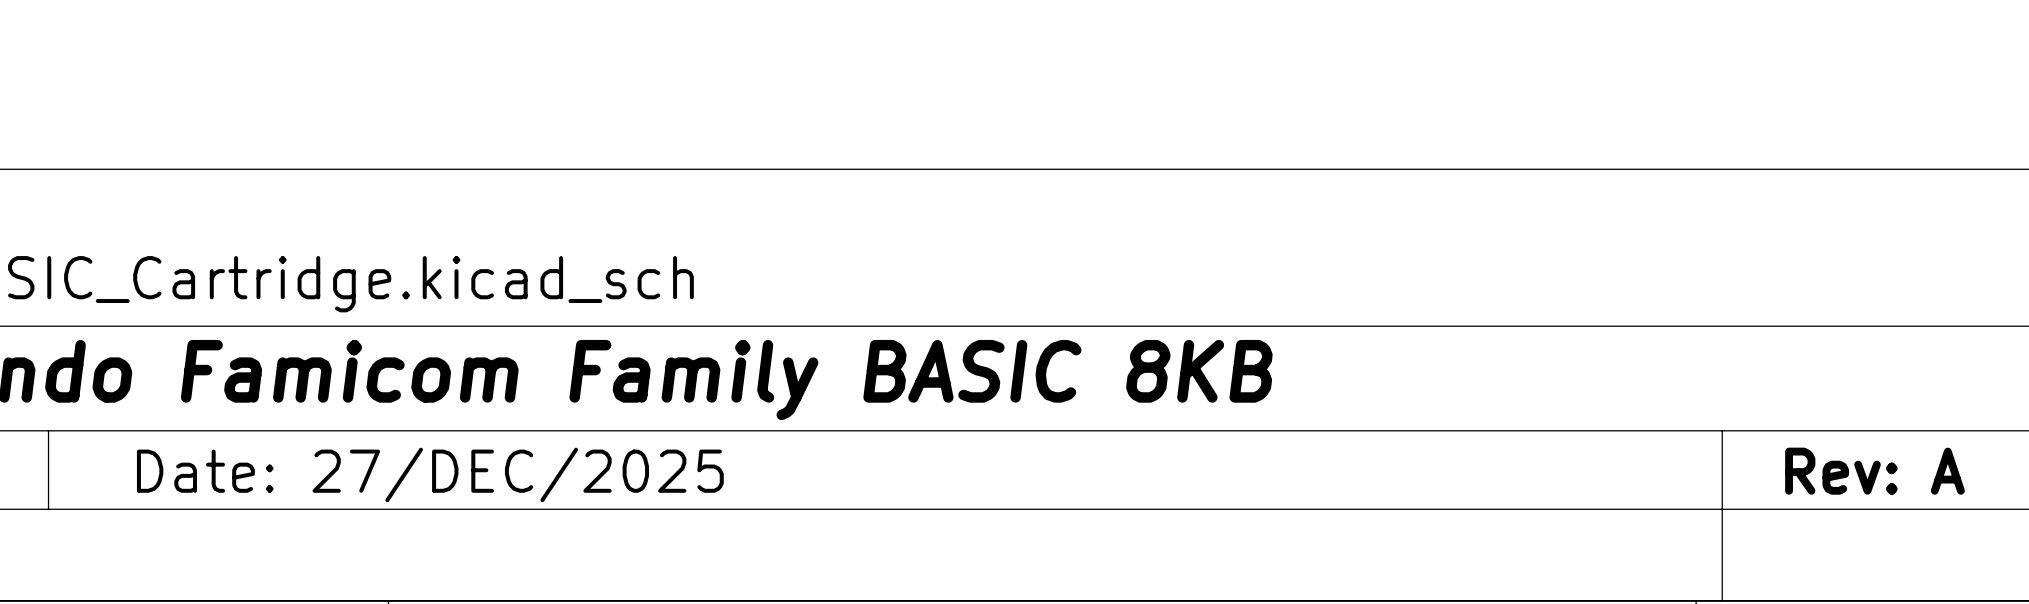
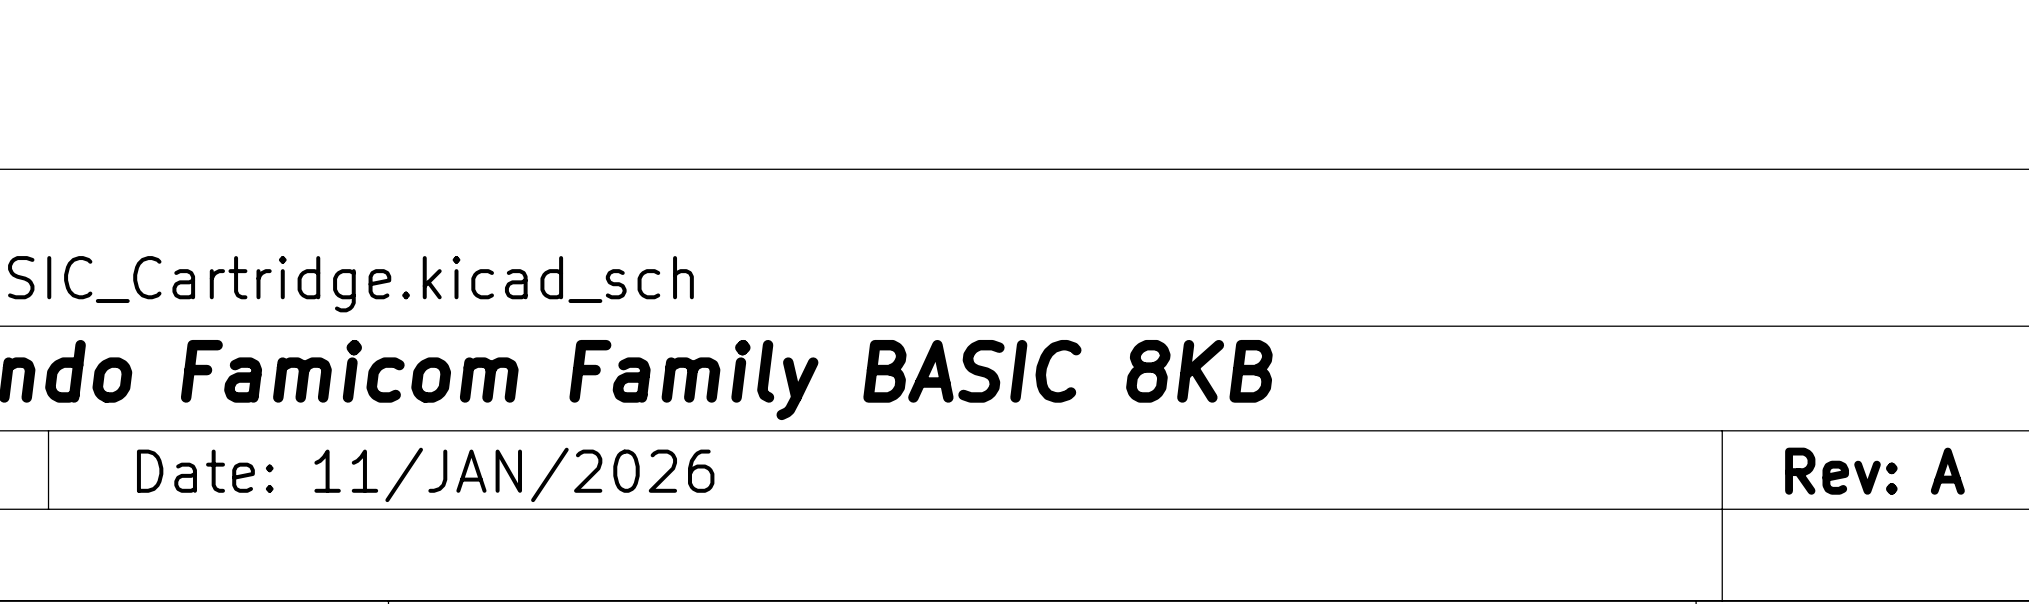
title block: Date: 27/DEC/2025 (430, 474) -> Date: 11/JAN/2026 (425, 474)

